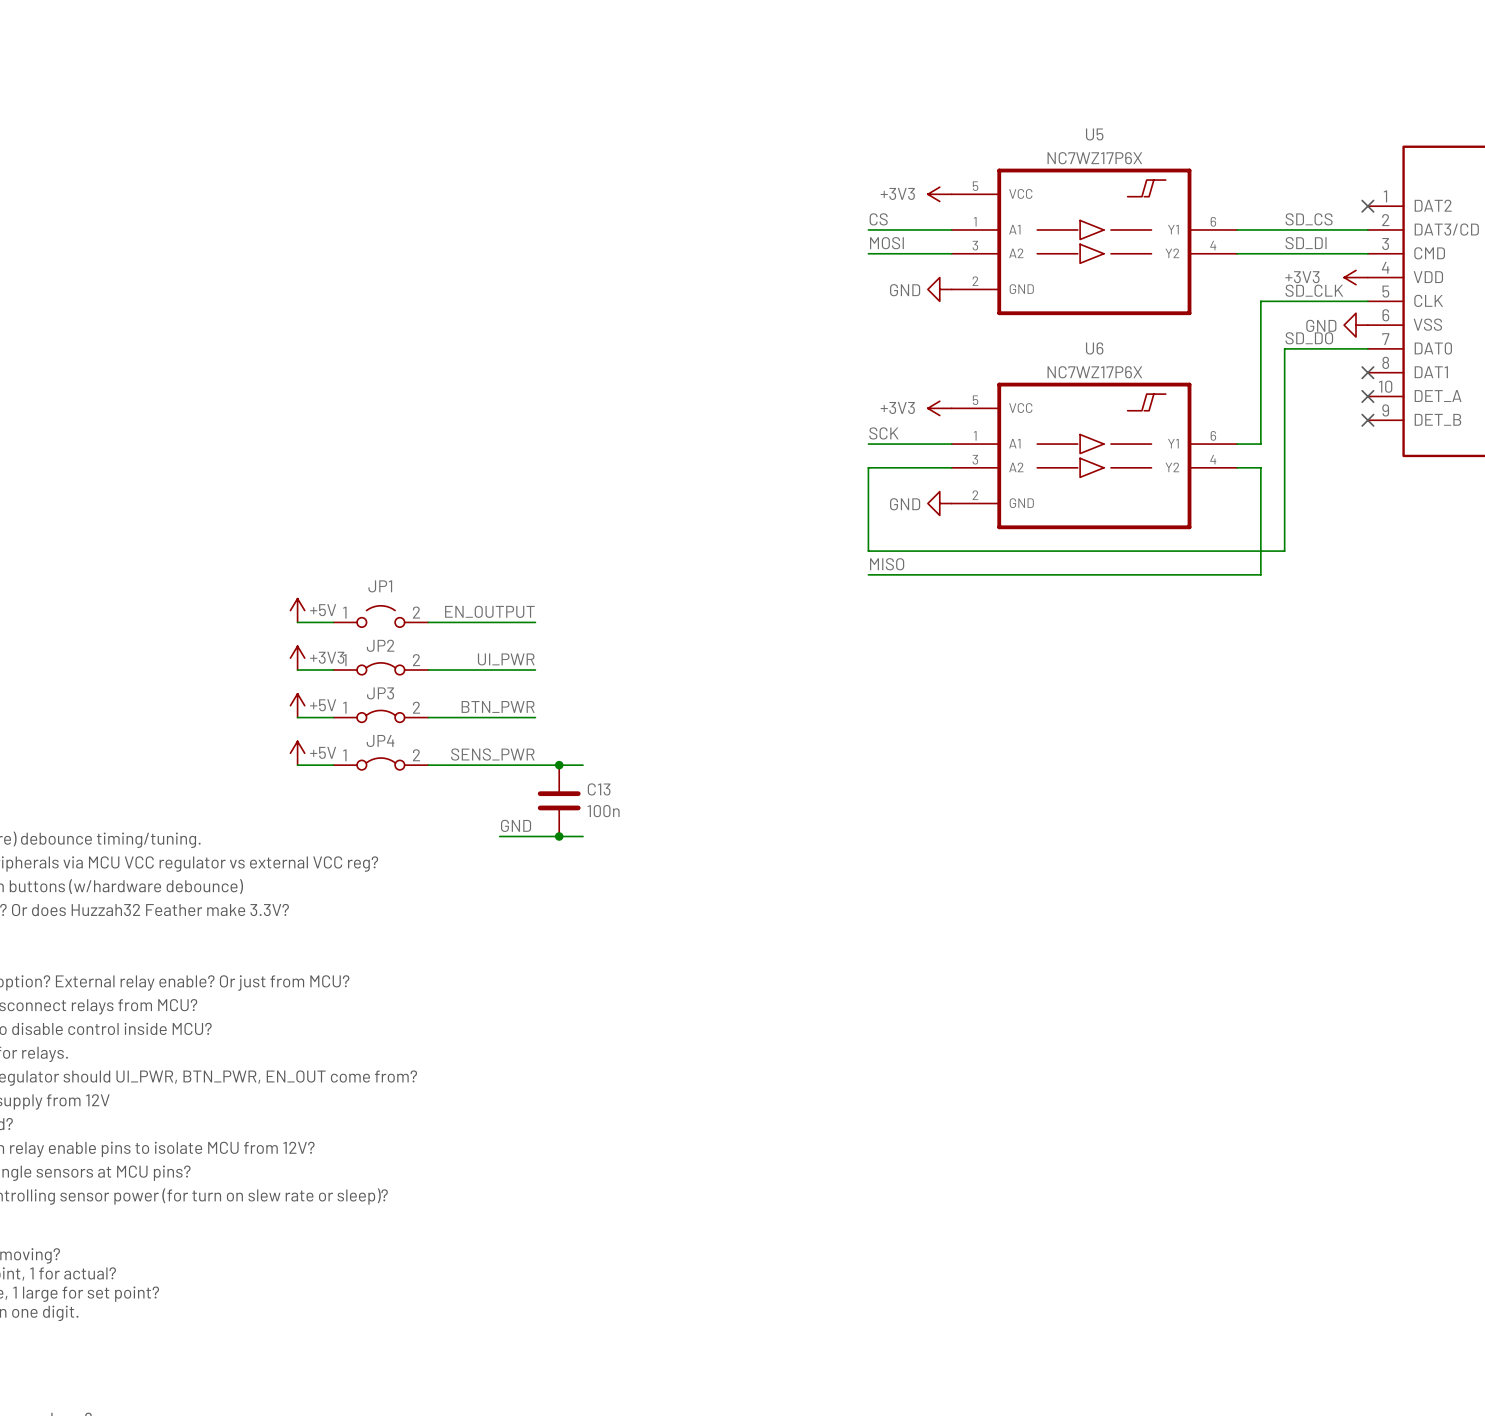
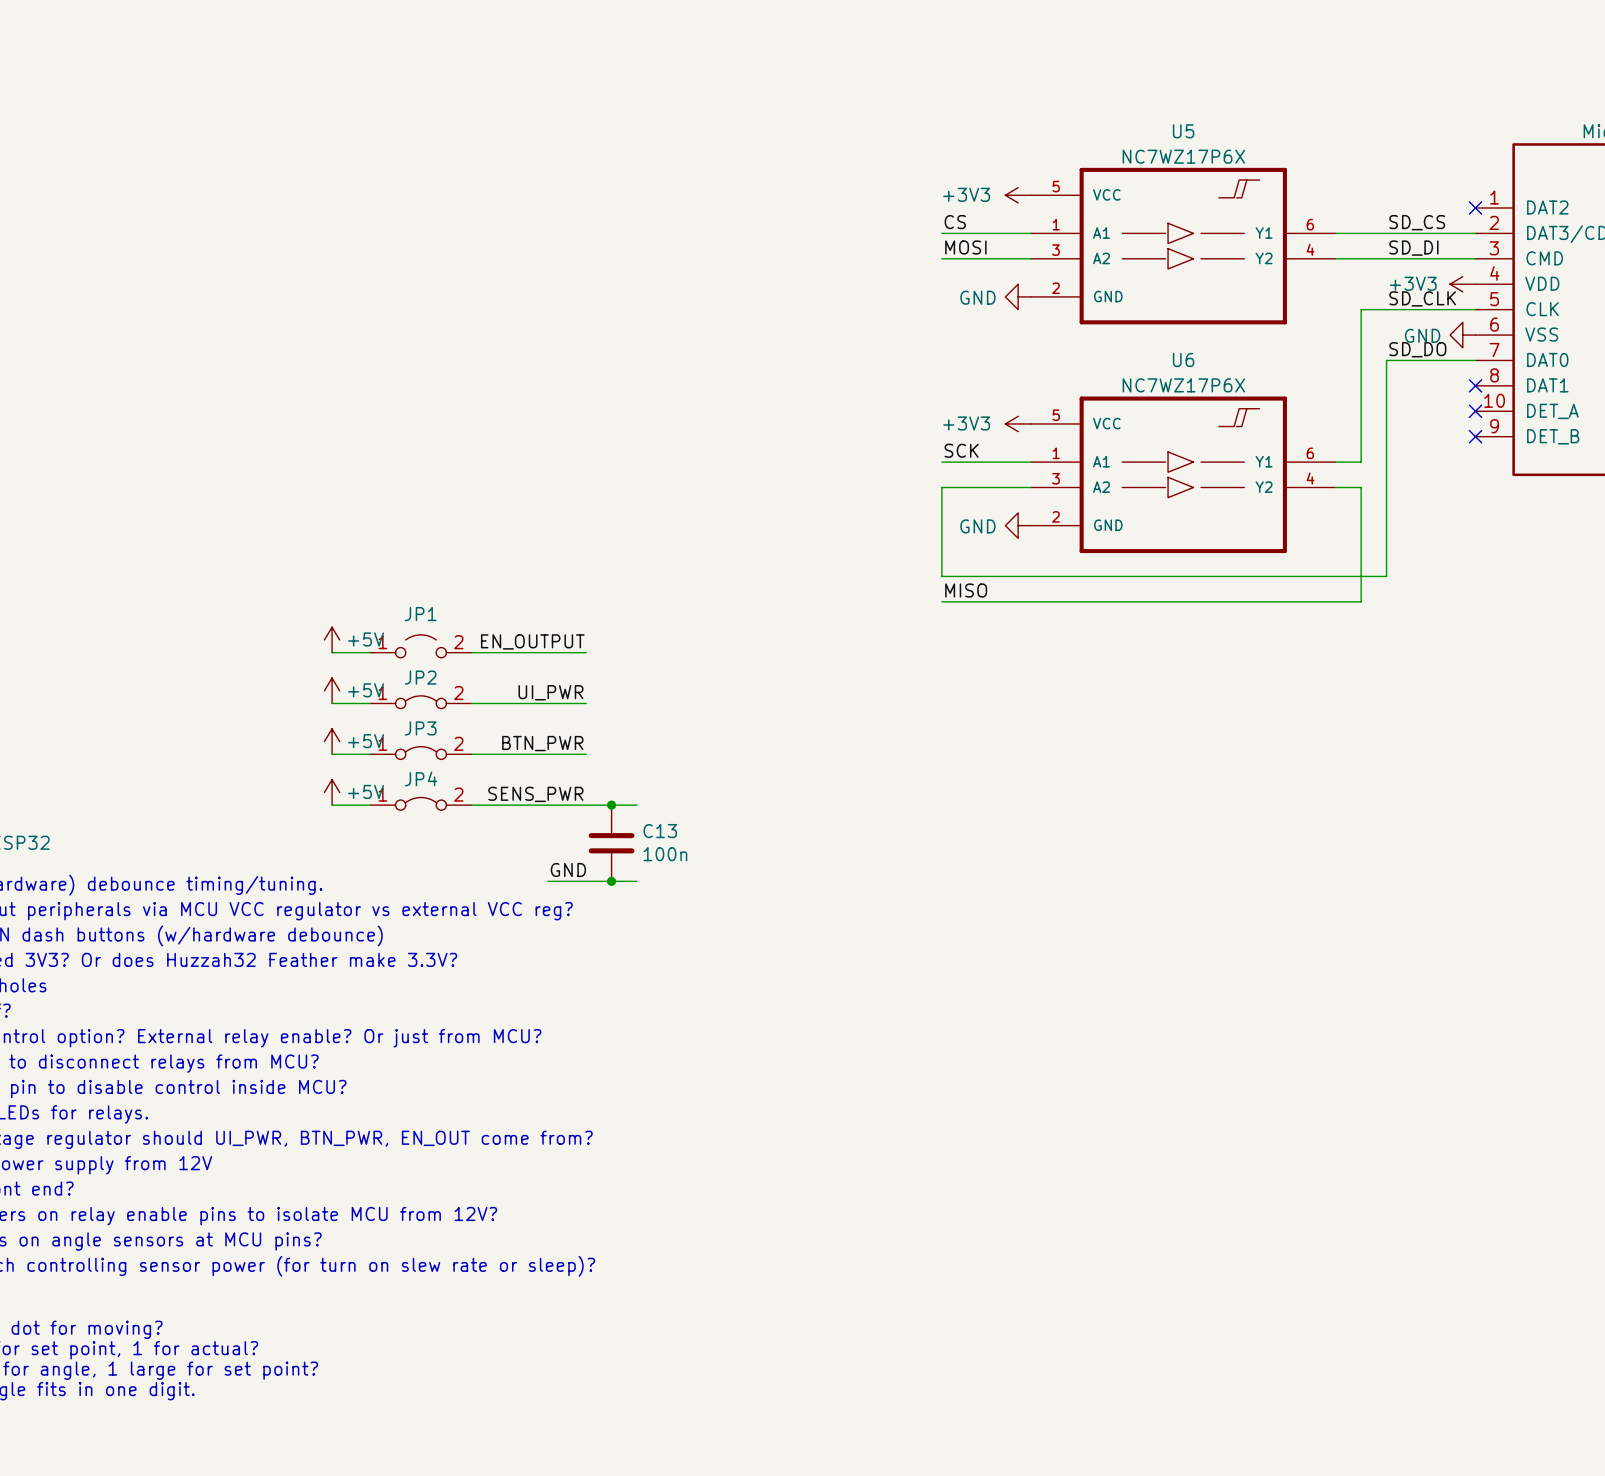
power symbol: +3V3 (297, 658) -> +5V (332, 690)

